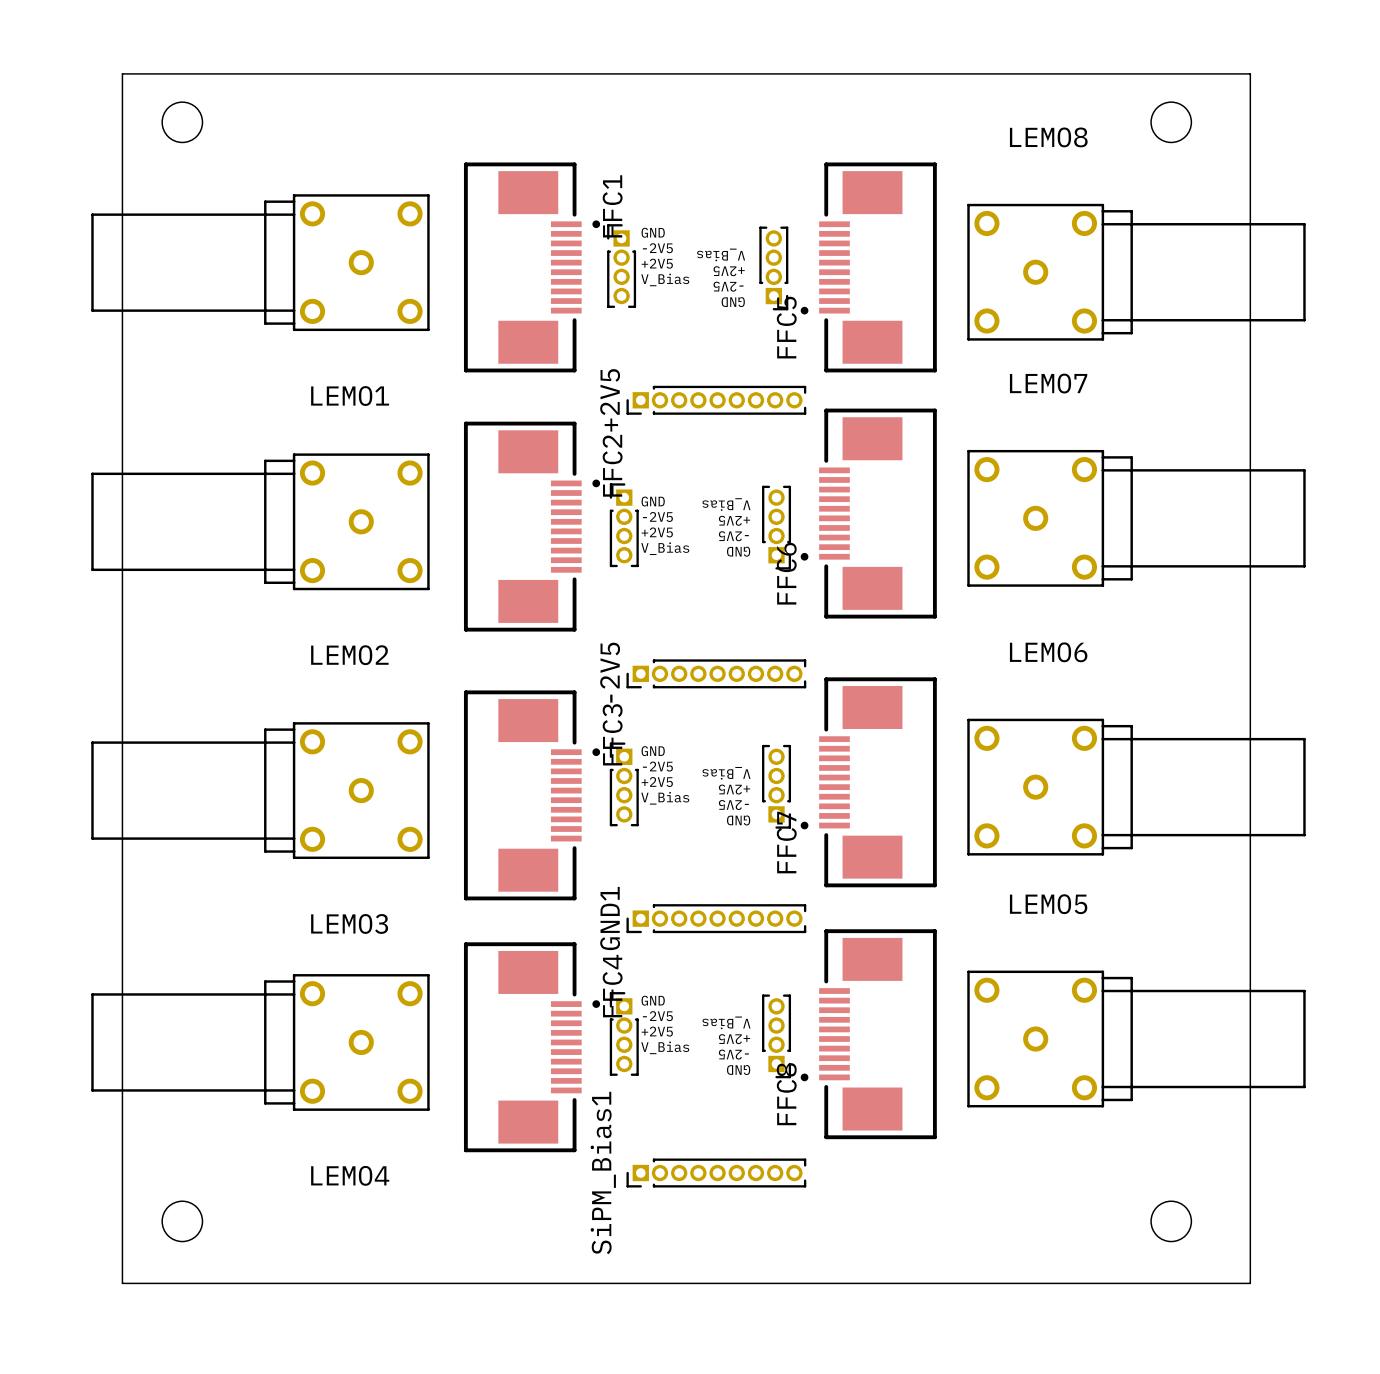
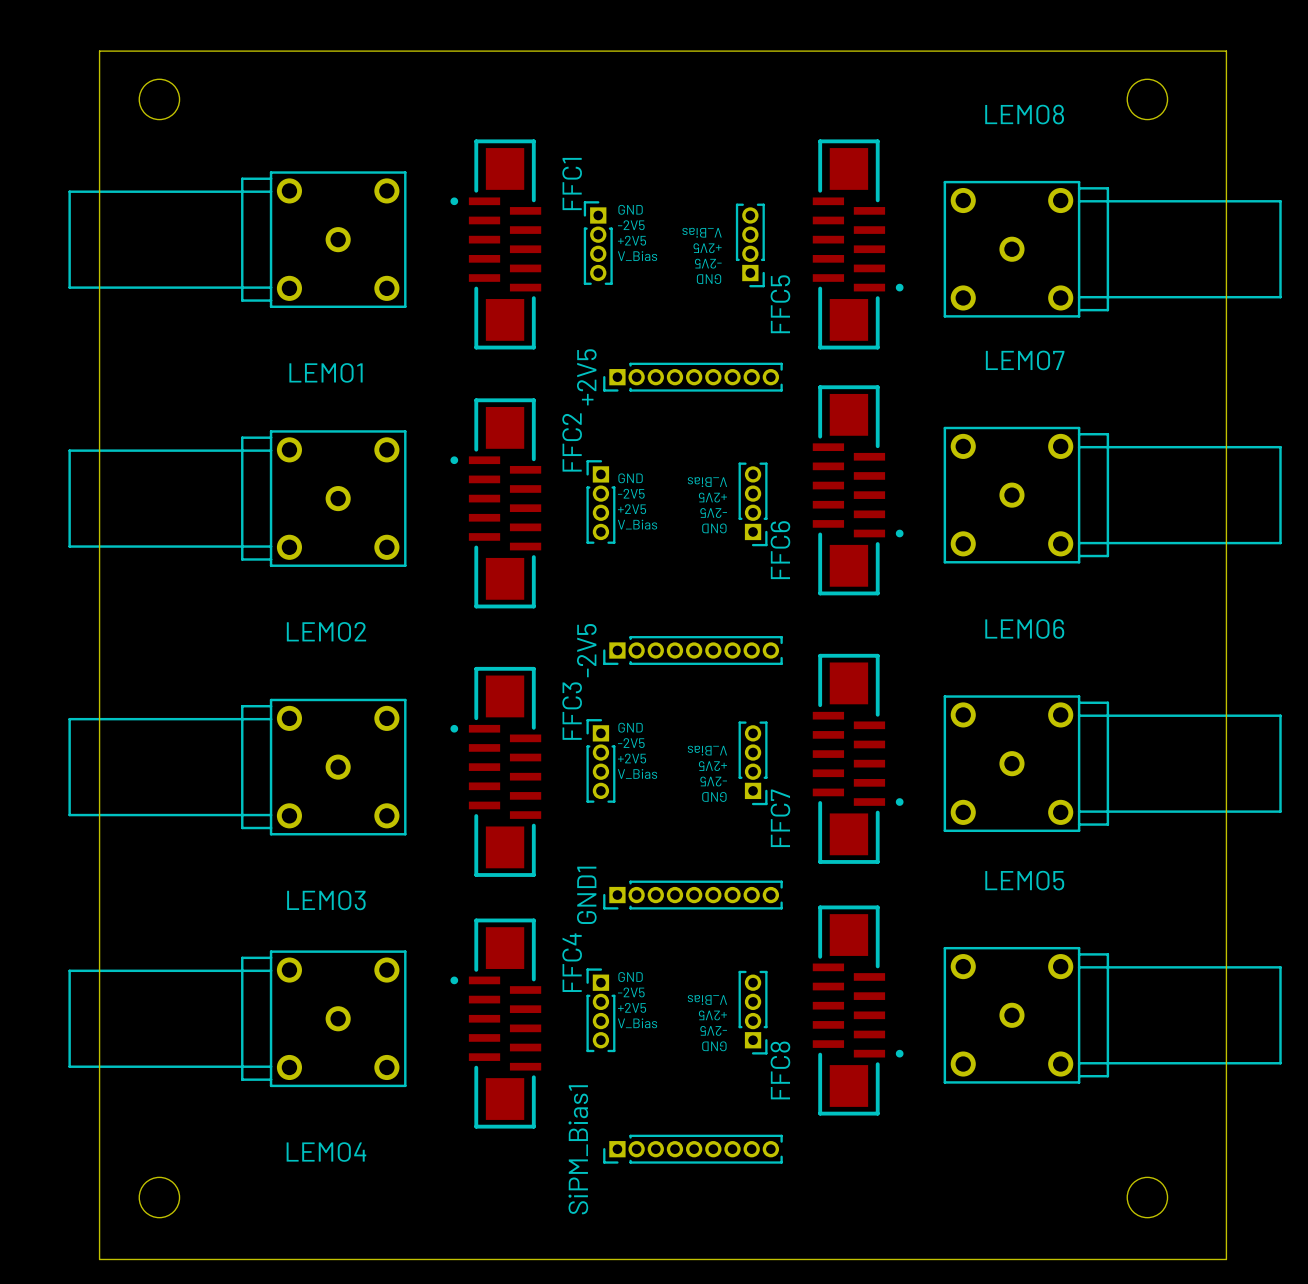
FFC1 footprint: [463, 162, 601, 373] -> [450, 139, 542, 350]
FFC5 footprint: [800, 162, 937, 373] -> [812, 139, 904, 350]
FFC6 footprint: [800, 408, 937, 619] -> [812, 385, 904, 596]
FFC2 footprint: [463, 421, 601, 632] -> [450, 398, 542, 609]
FFC7 footprint: [800, 677, 937, 888] -> [812, 653, 904, 864]
FFC3 footprint: [463, 690, 601, 901] -> [450, 666, 542, 877]
FFC8 footprint: [800, 929, 937, 1140] -> [812, 905, 904, 1116]
FFC4 footprint: [463, 942, 601, 1153] -> [450, 918, 542, 1129]

